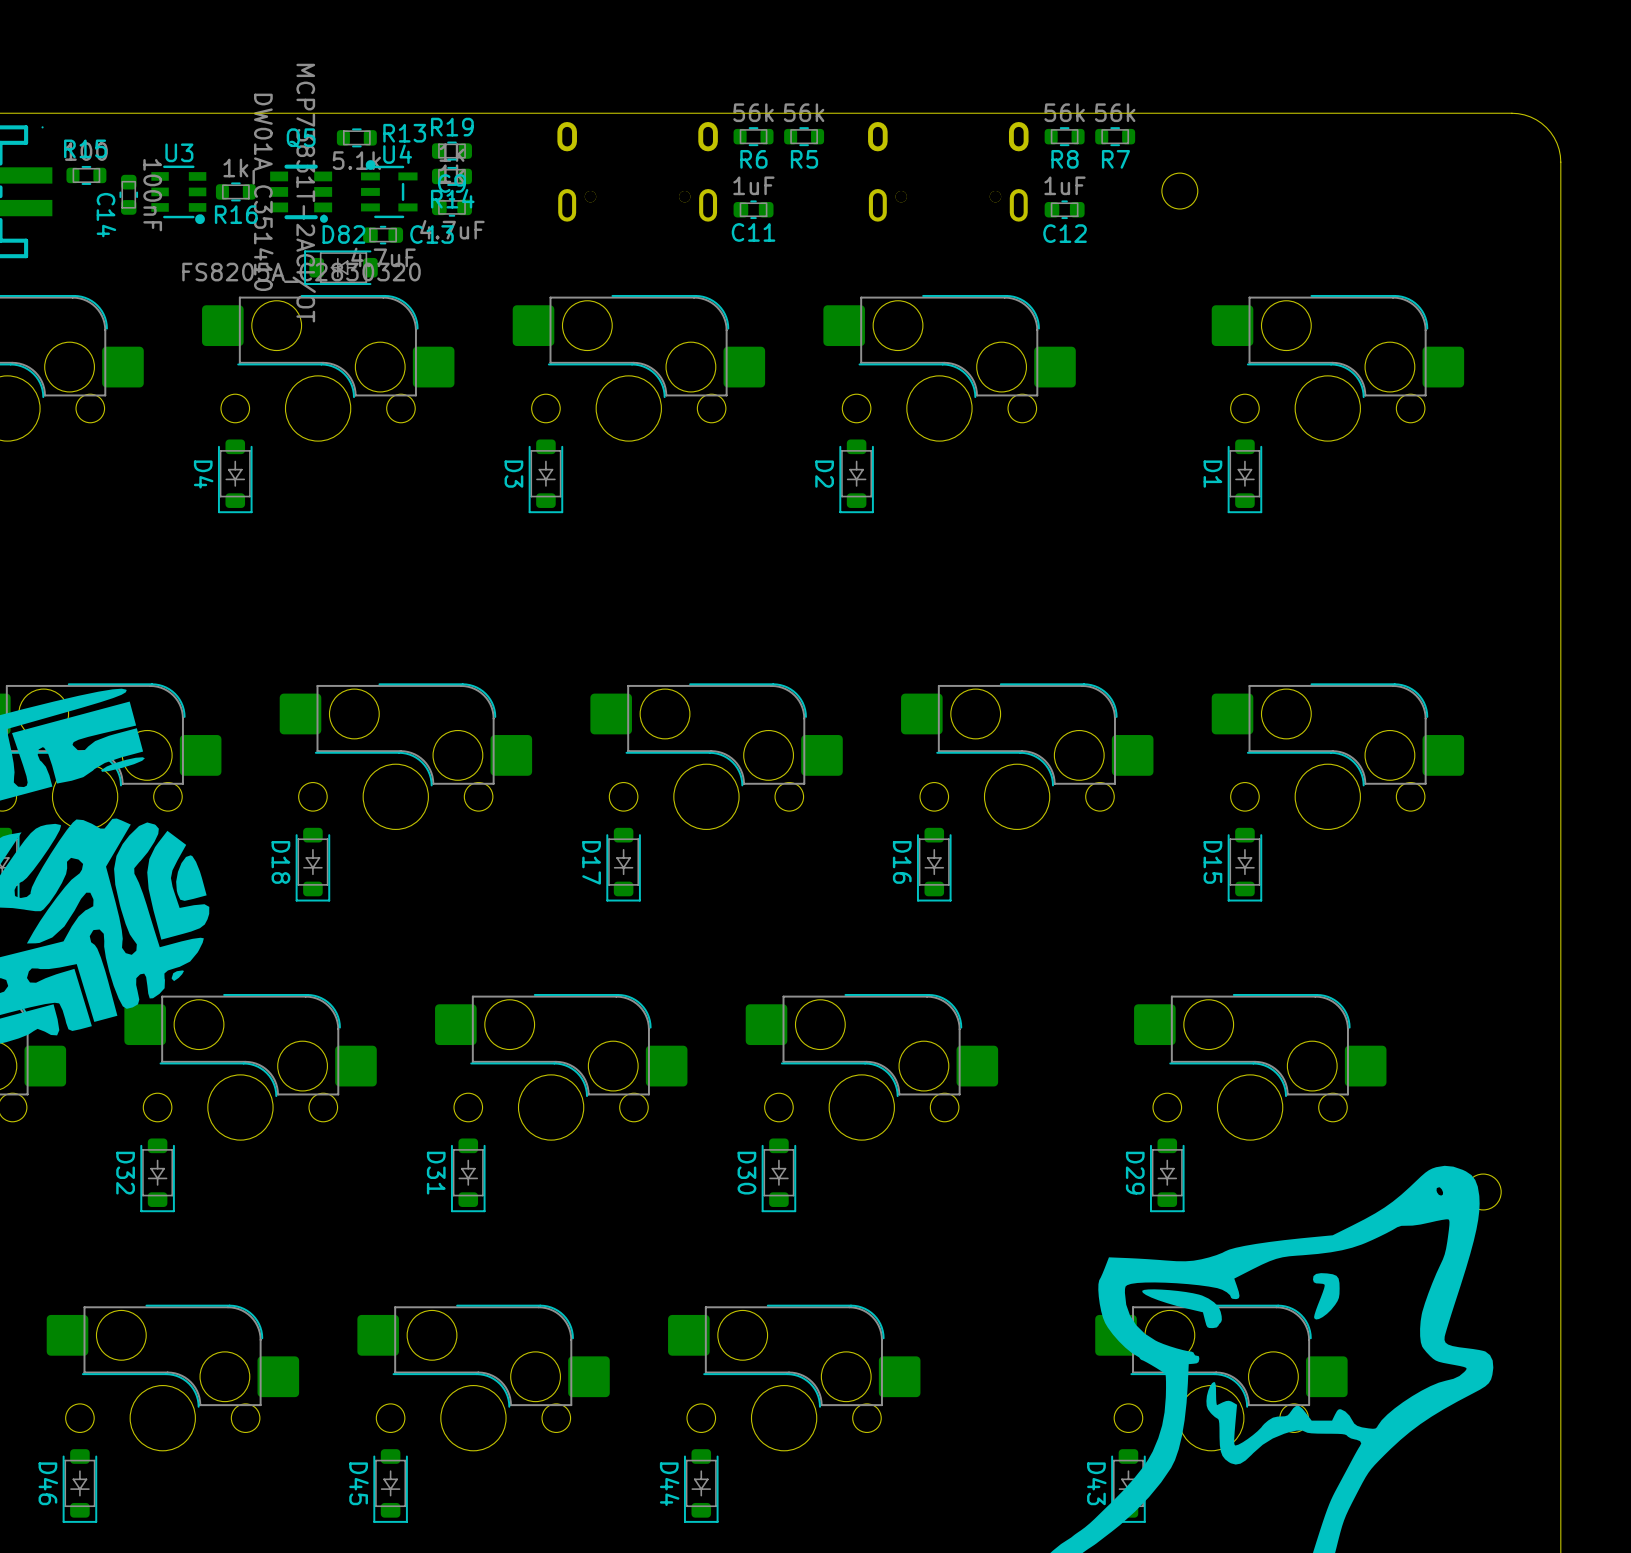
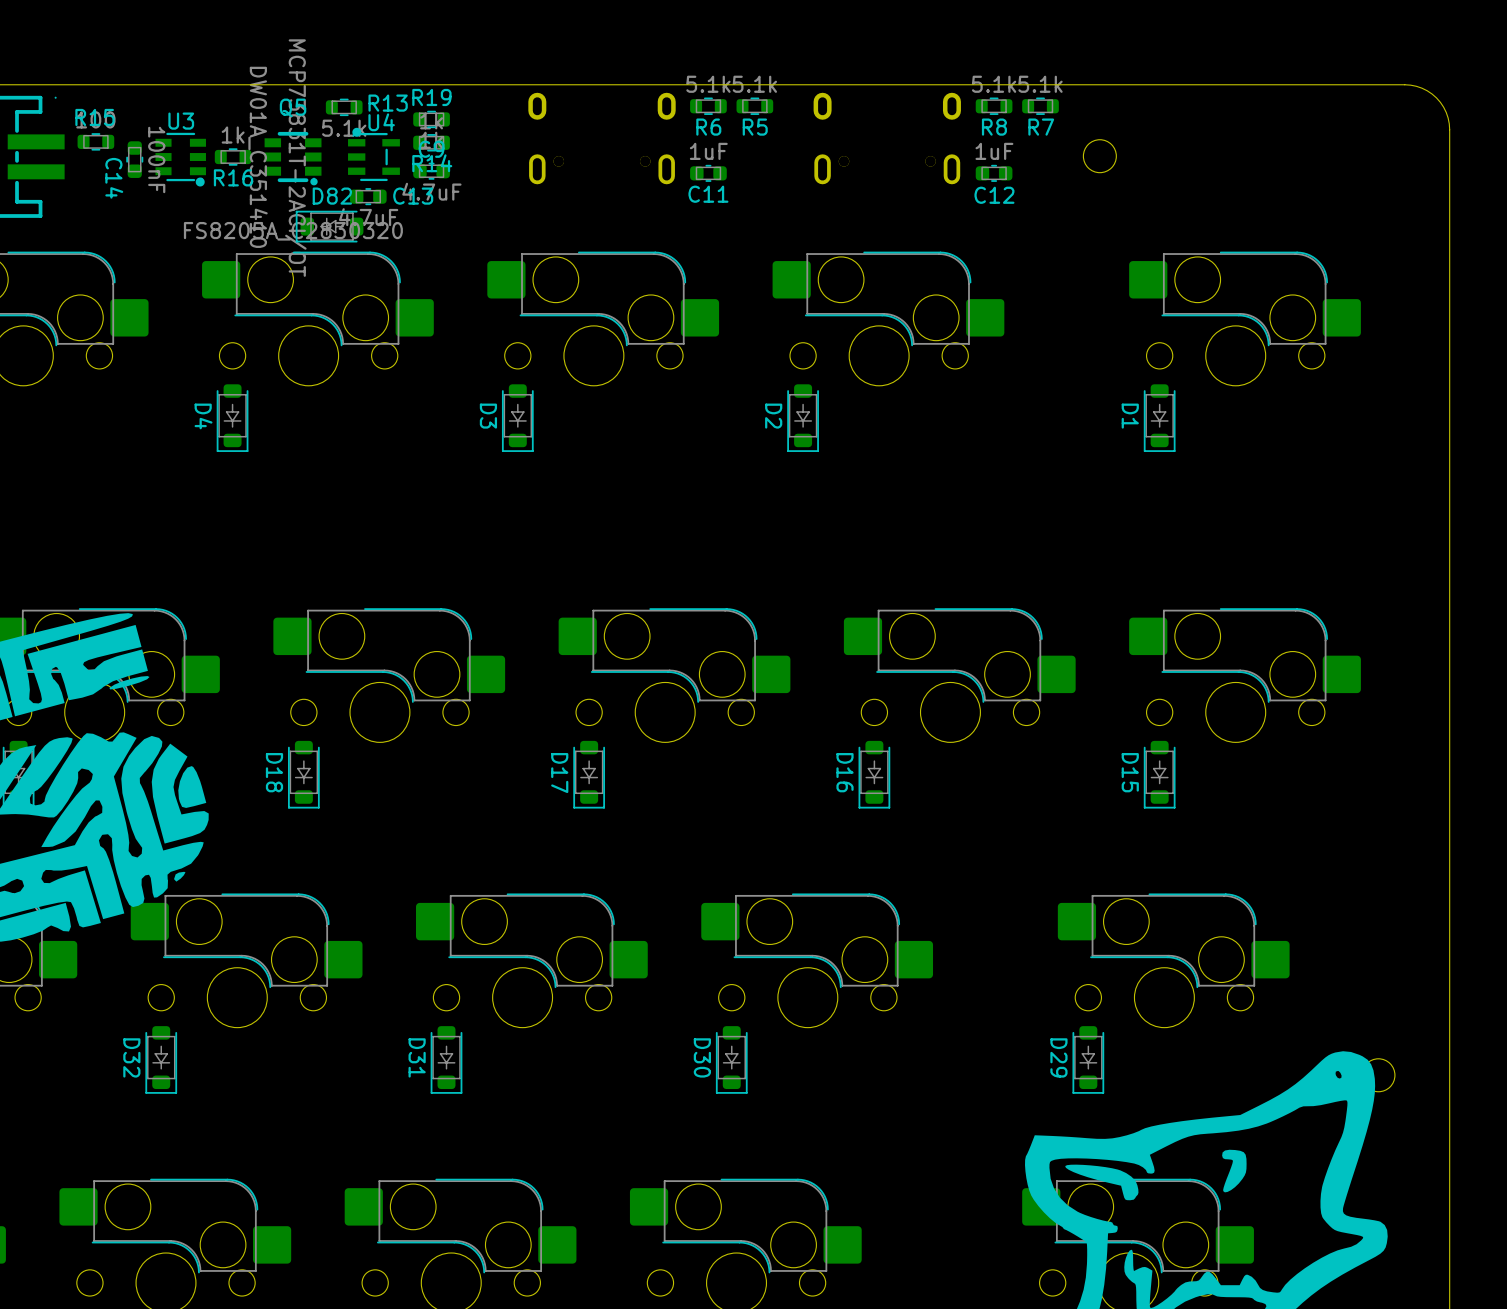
R6 value: 56k (753, 112) -> 5.1k (708, 84)
R5 value: 56k (804, 112) -> 5.1k (754, 84)
R8 value: 56k (1064, 112) -> 5.1k (994, 84)
R7 value: 56k (1115, 112) -> 5.1k (1040, 84)

